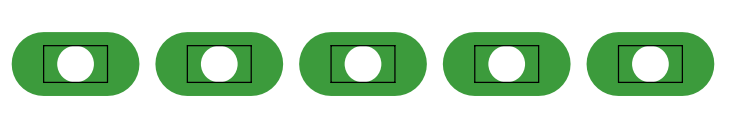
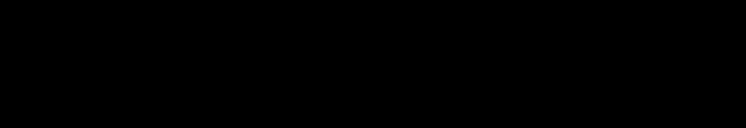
part: (75, 64) -> none
part: (219, 64) -> none
part: (362, 64) -> none
part: (506, 64) -> none
part: (650, 64) -> none

